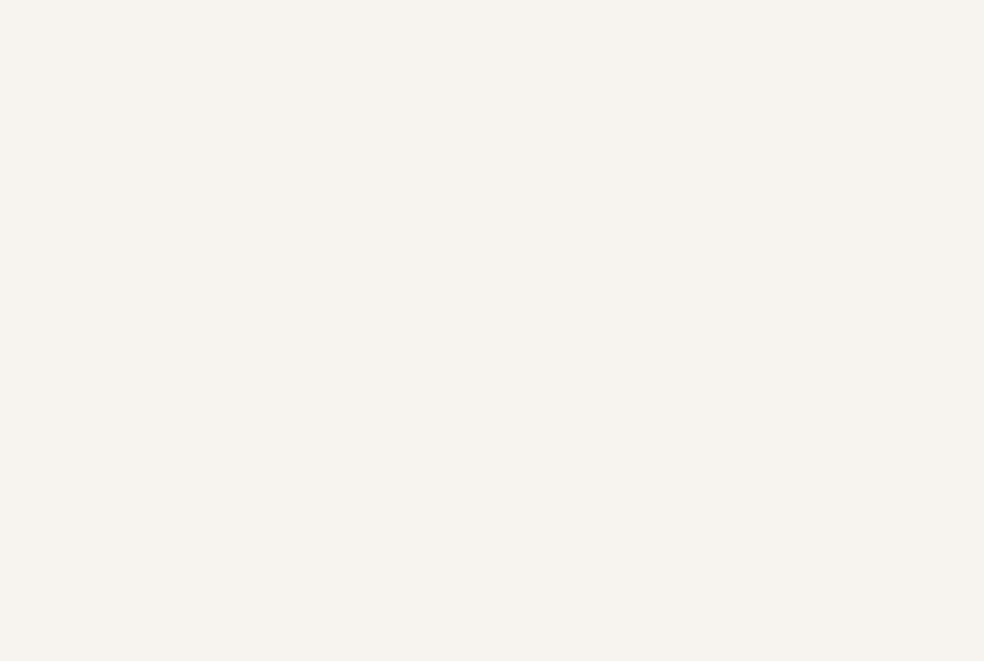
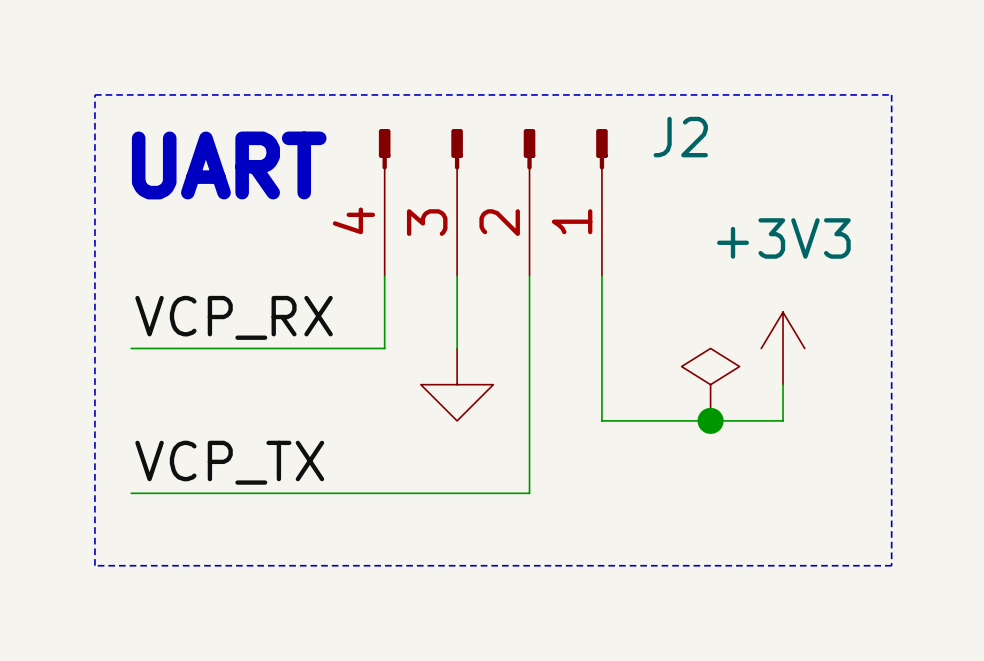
line: none -> (94, 94) (891, 94) (891, 565) (94, 565) (94, 94)
text: none -> UART (229, 165)
J2: none -> (493, 202)
wire: none -> (384, 276) (384, 348) (131, 348)
wire: none -> (457, 276) (457, 348)
wire: none -> (529, 276) (529, 493) (131, 493)
wire: none -> (601, 276) (601, 420) (783, 420) (783, 384)
label: none -> VCP_RX (234, 317)
power symbol: none -> +3V3 (783, 348)
power symbol: none -> (457, 384)
power symbol: none -> (710, 384)
junction: none -> (710, 420)
label: none -> VCP_TX (229, 462)

